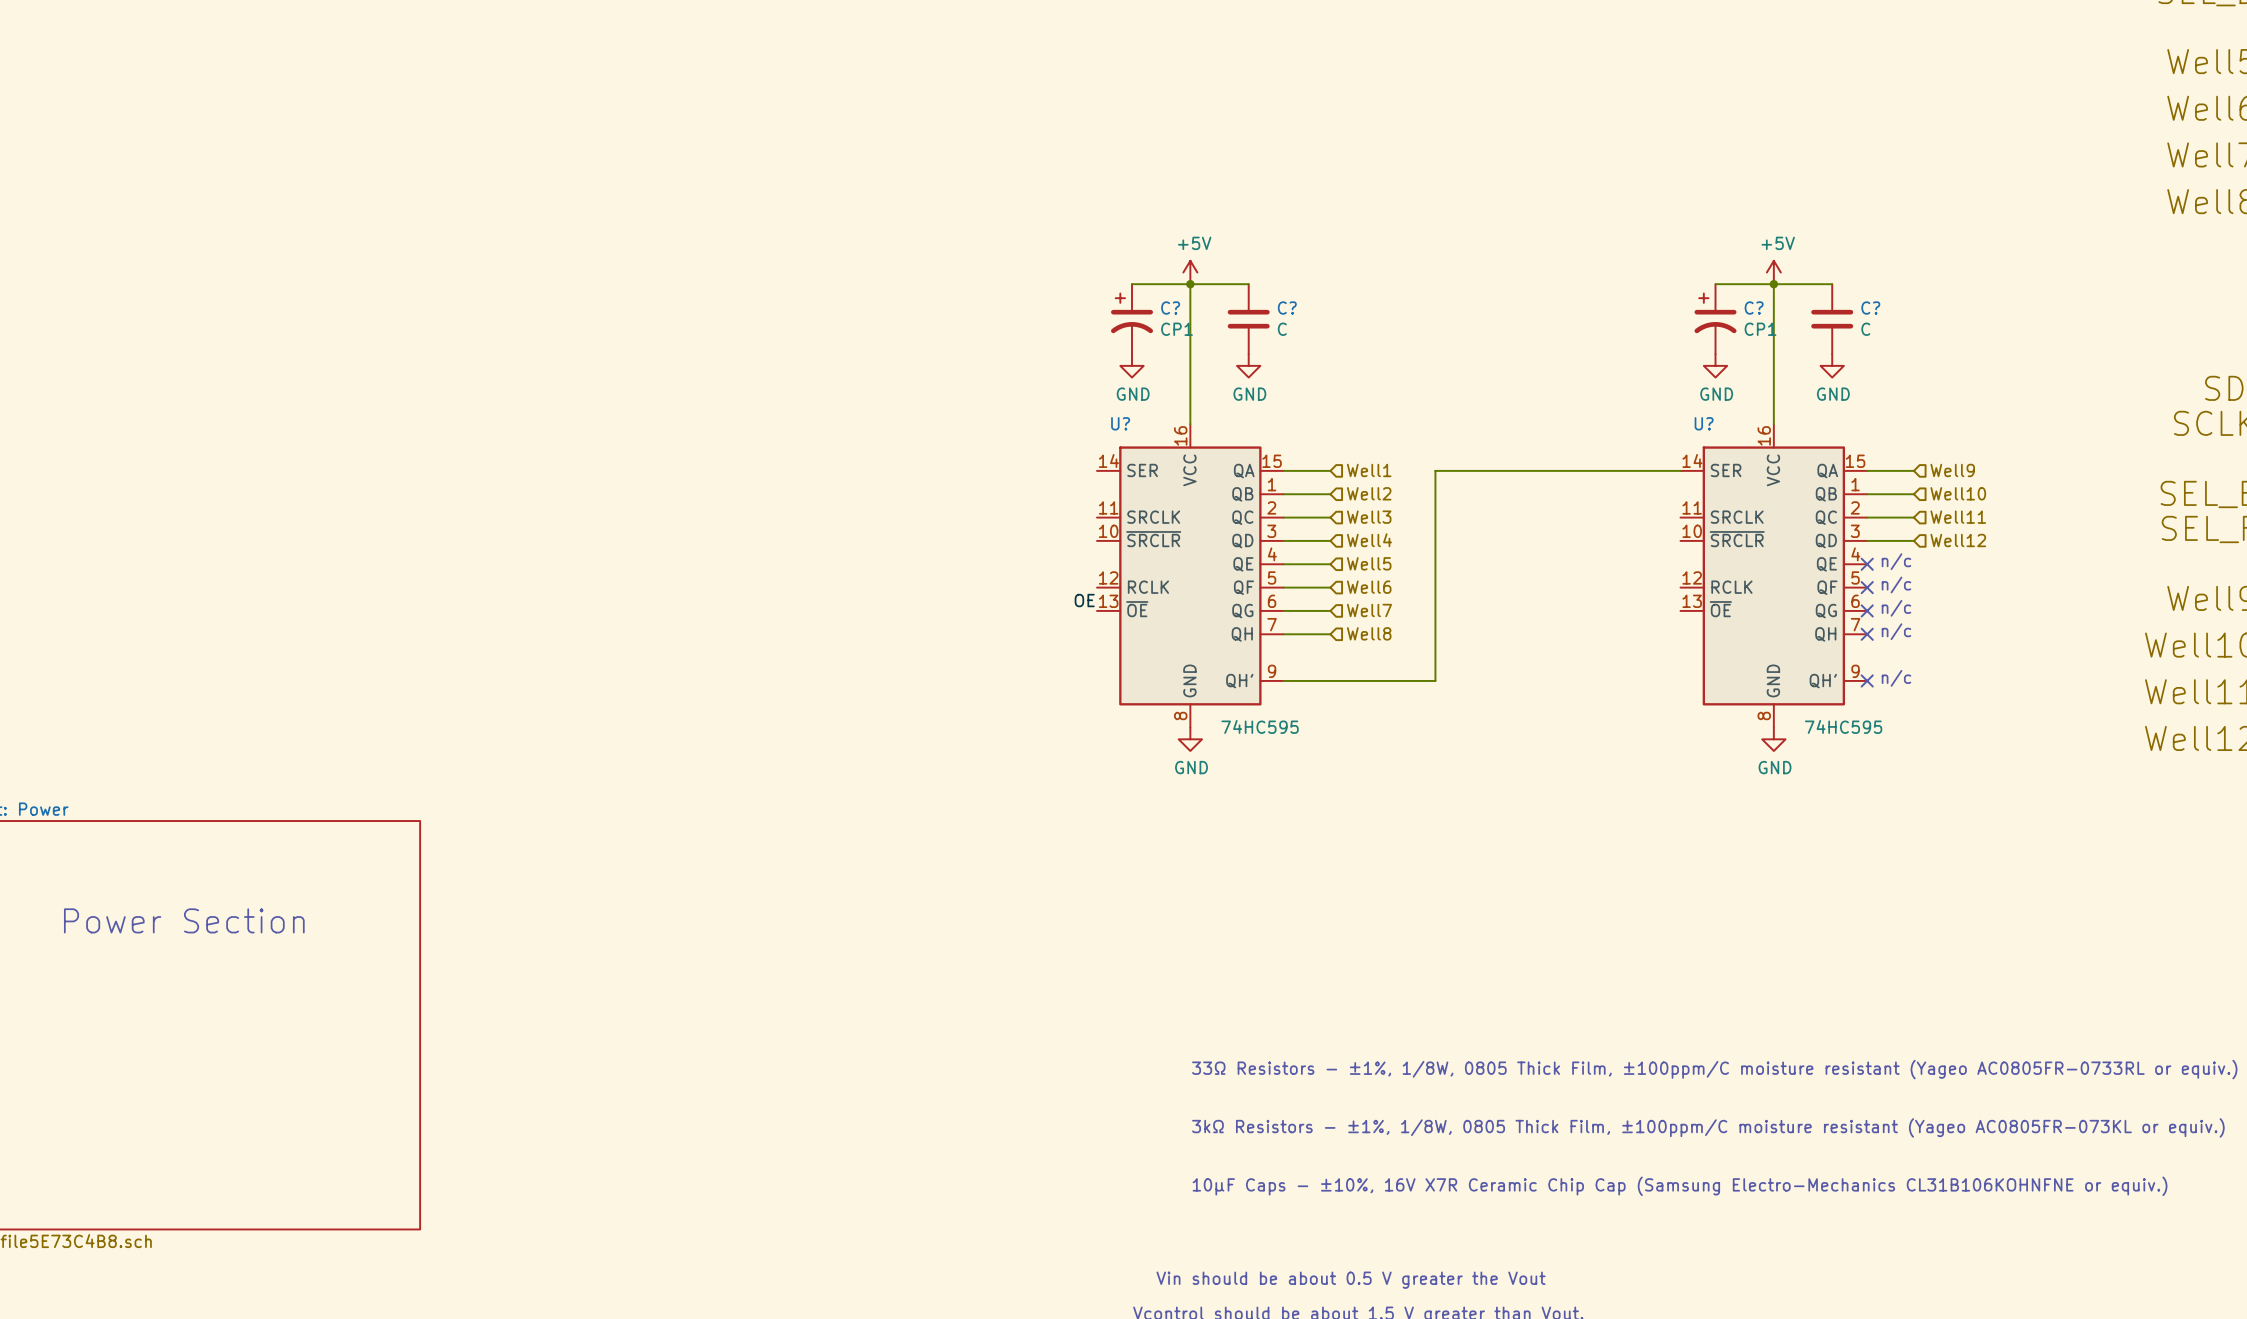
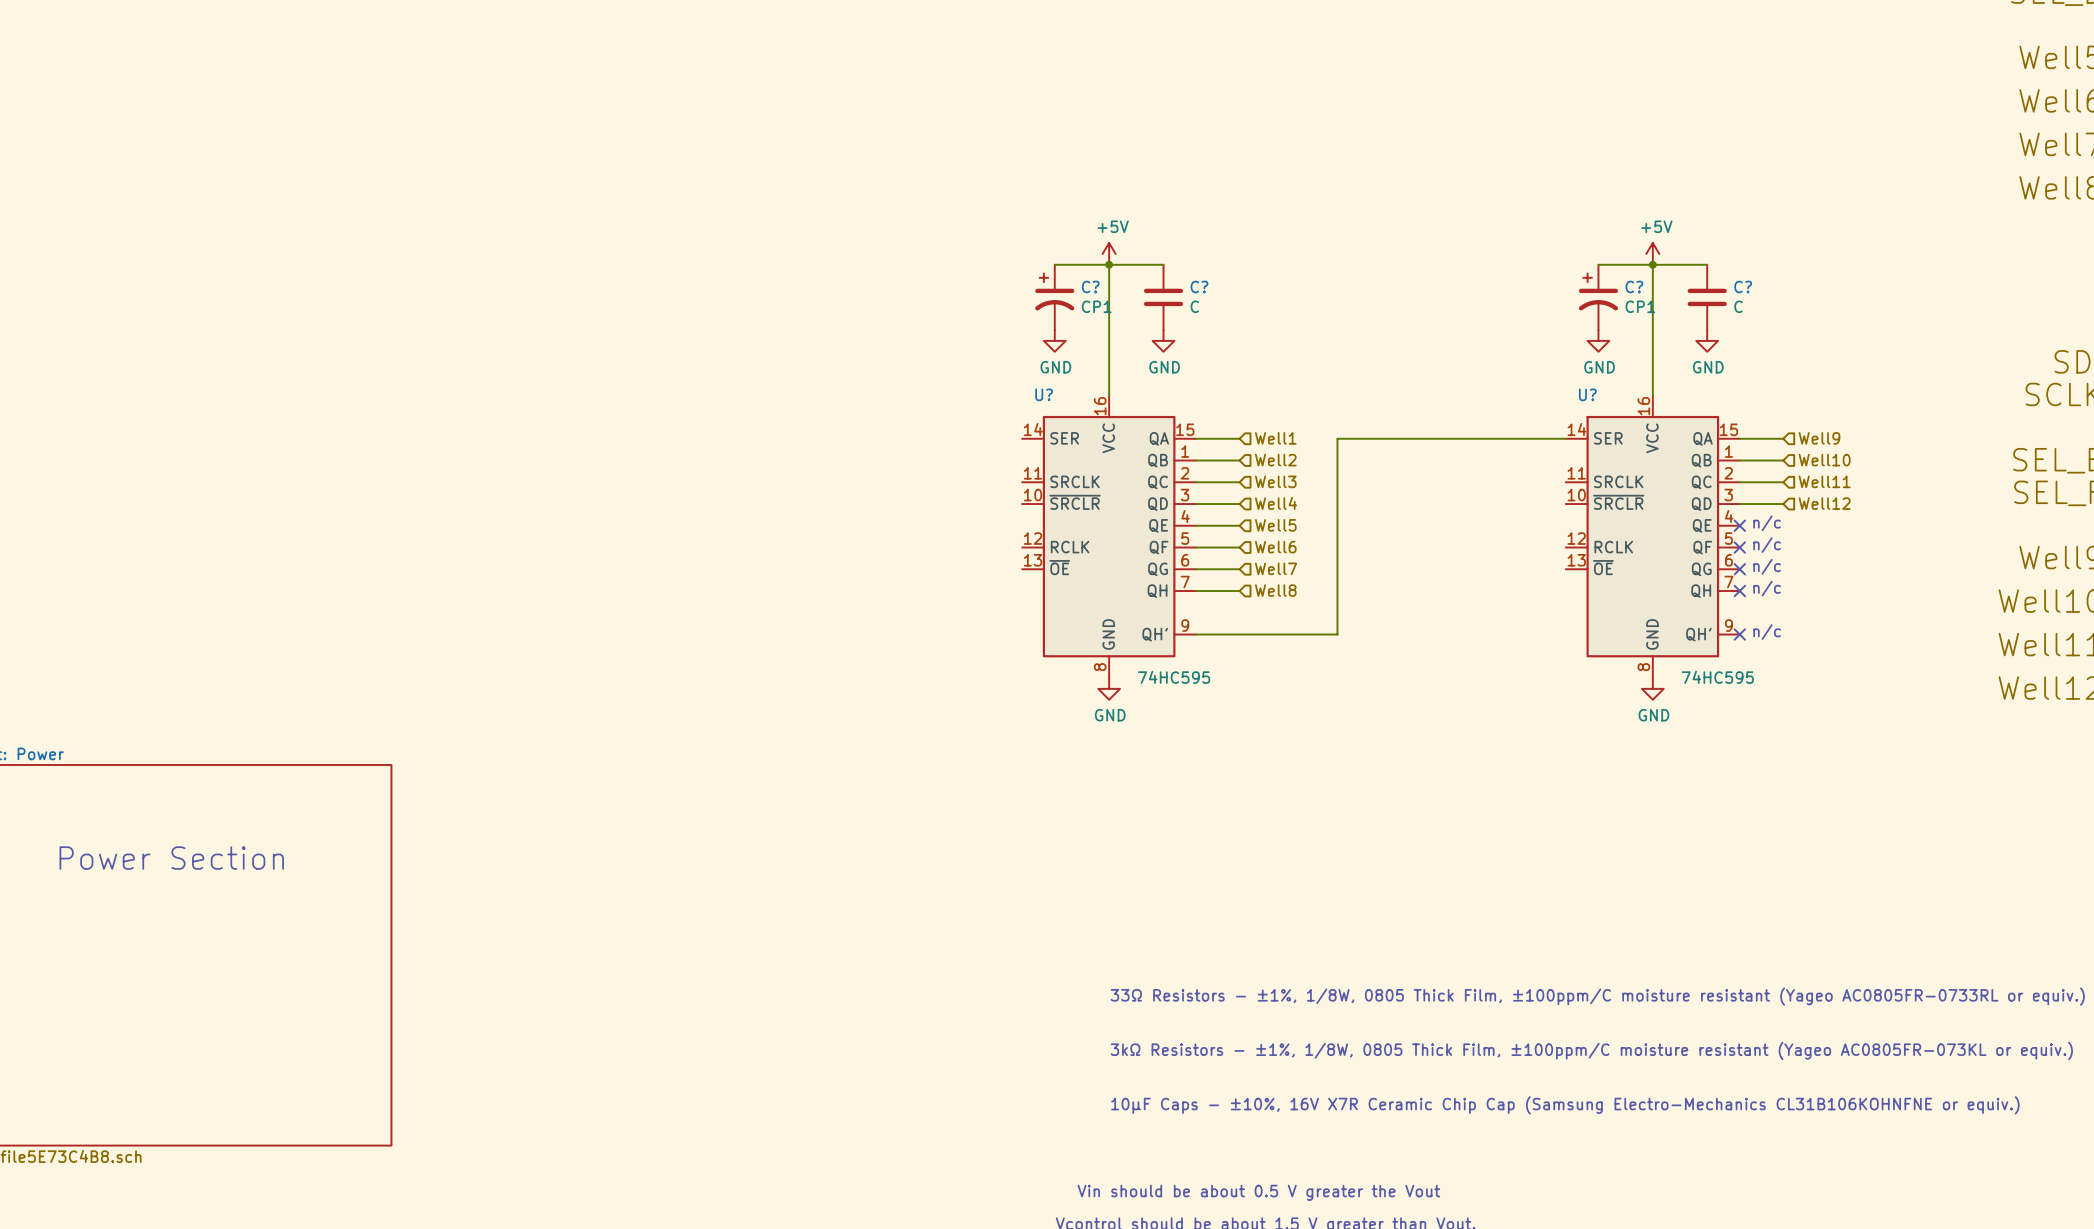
label: OE (1084, 600) -> none

